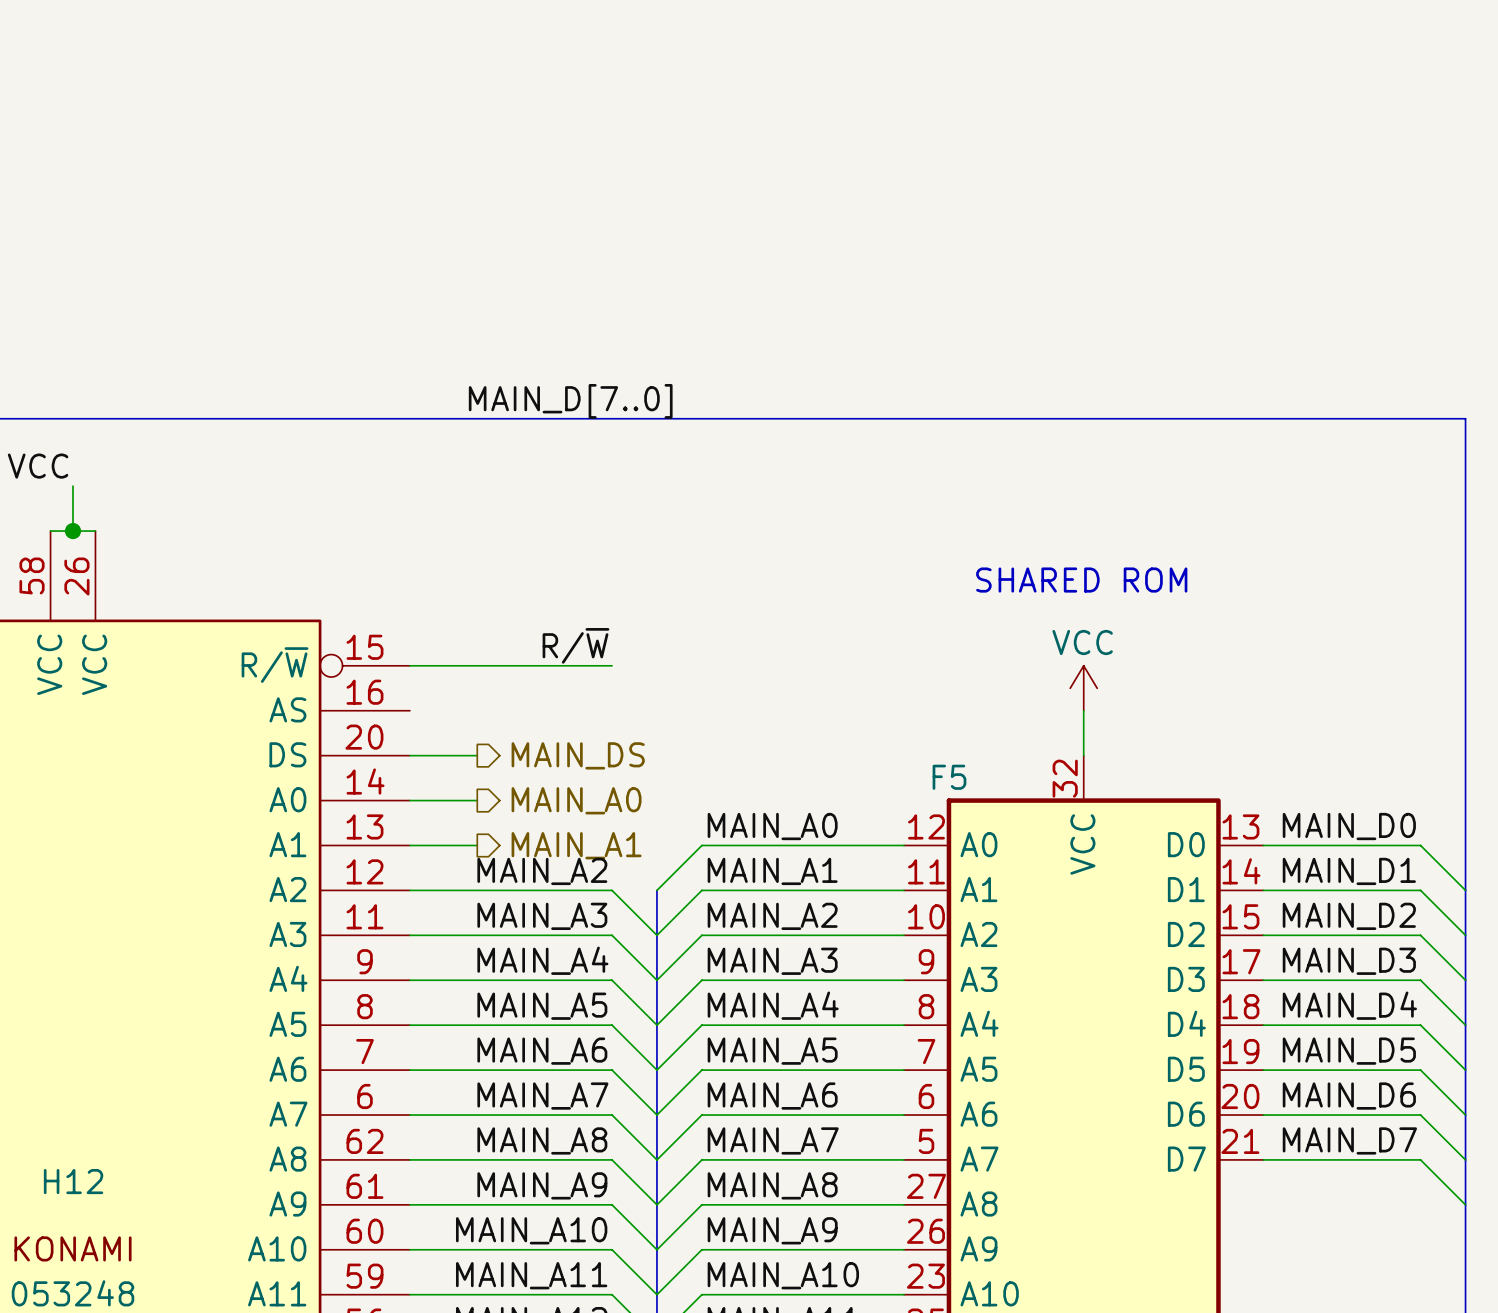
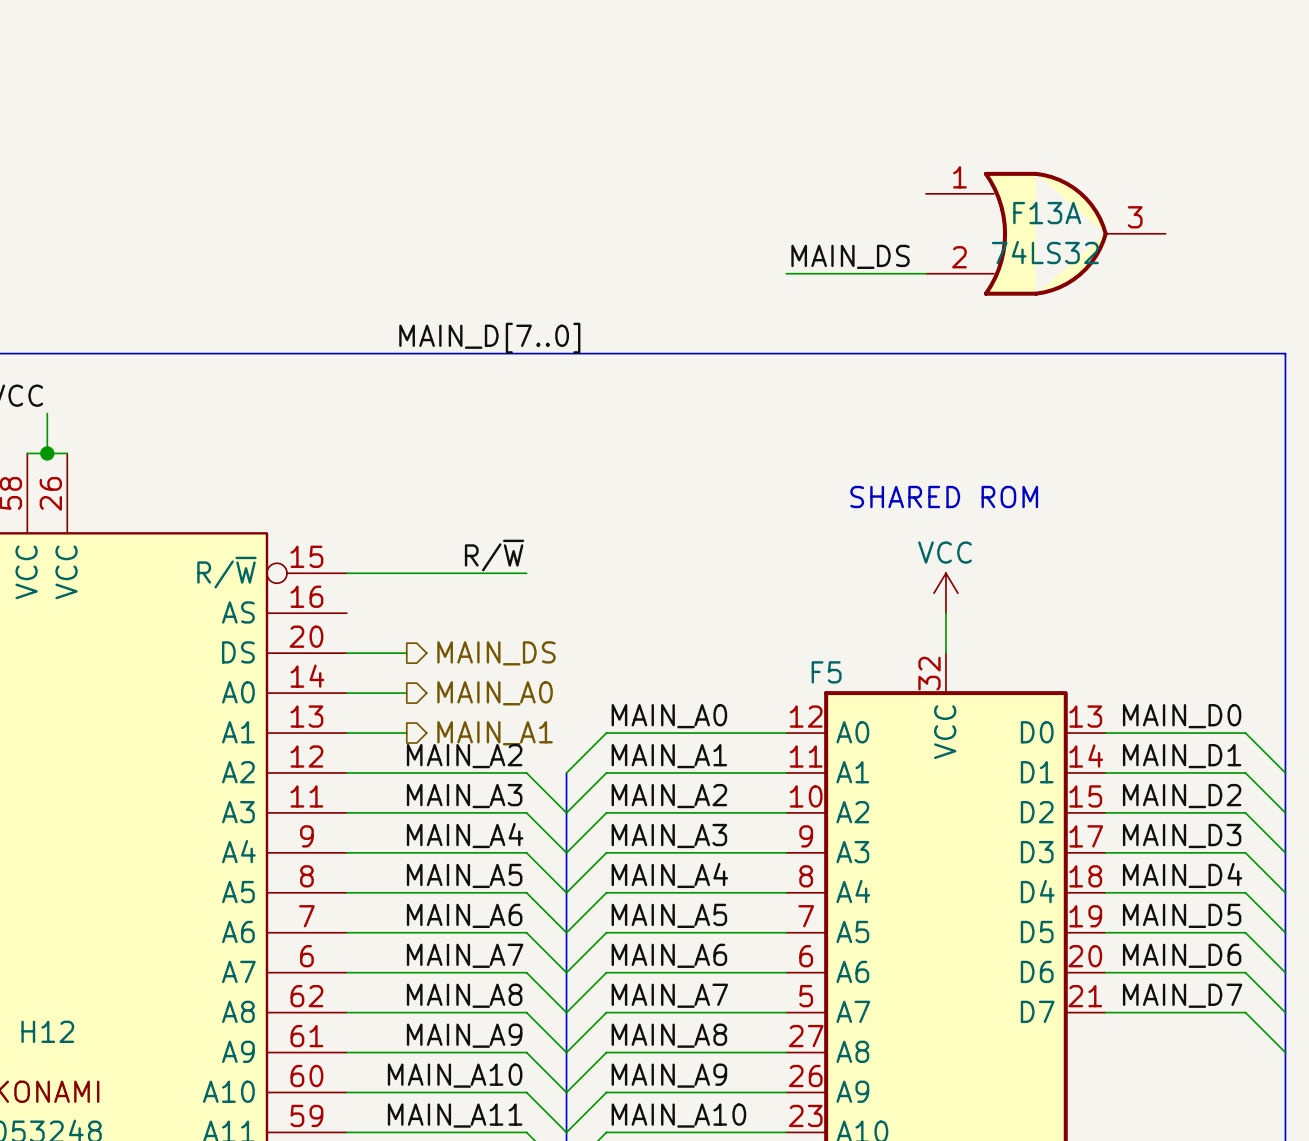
F13A: none -> 74LS32 (1045, 233)
label: none -> MAIN_DS (850, 256)
wire: none -> (786, 273) (925, 273)

